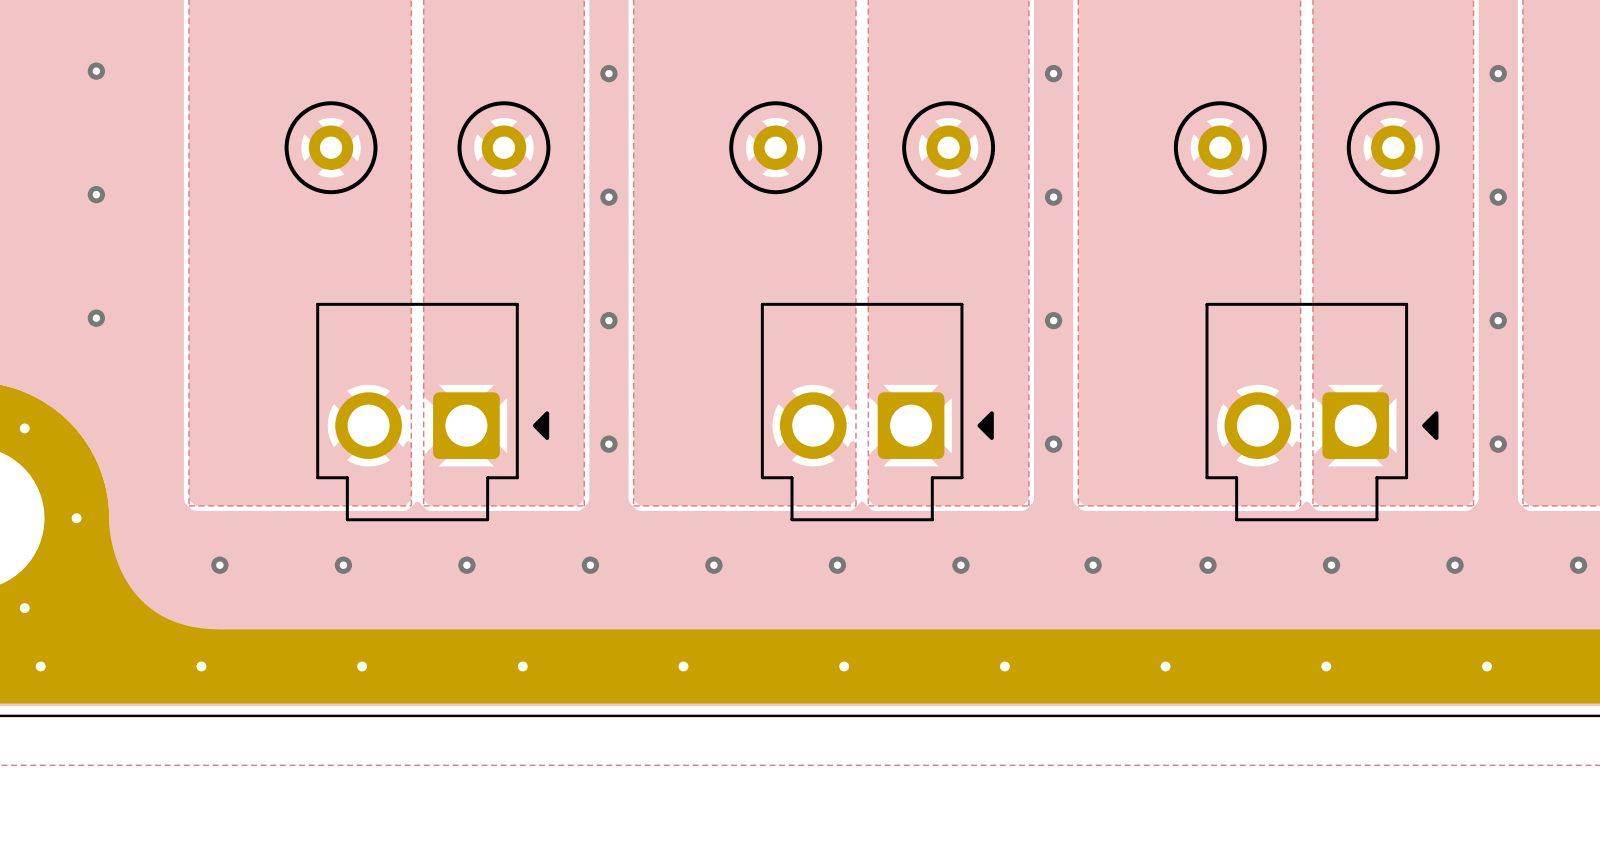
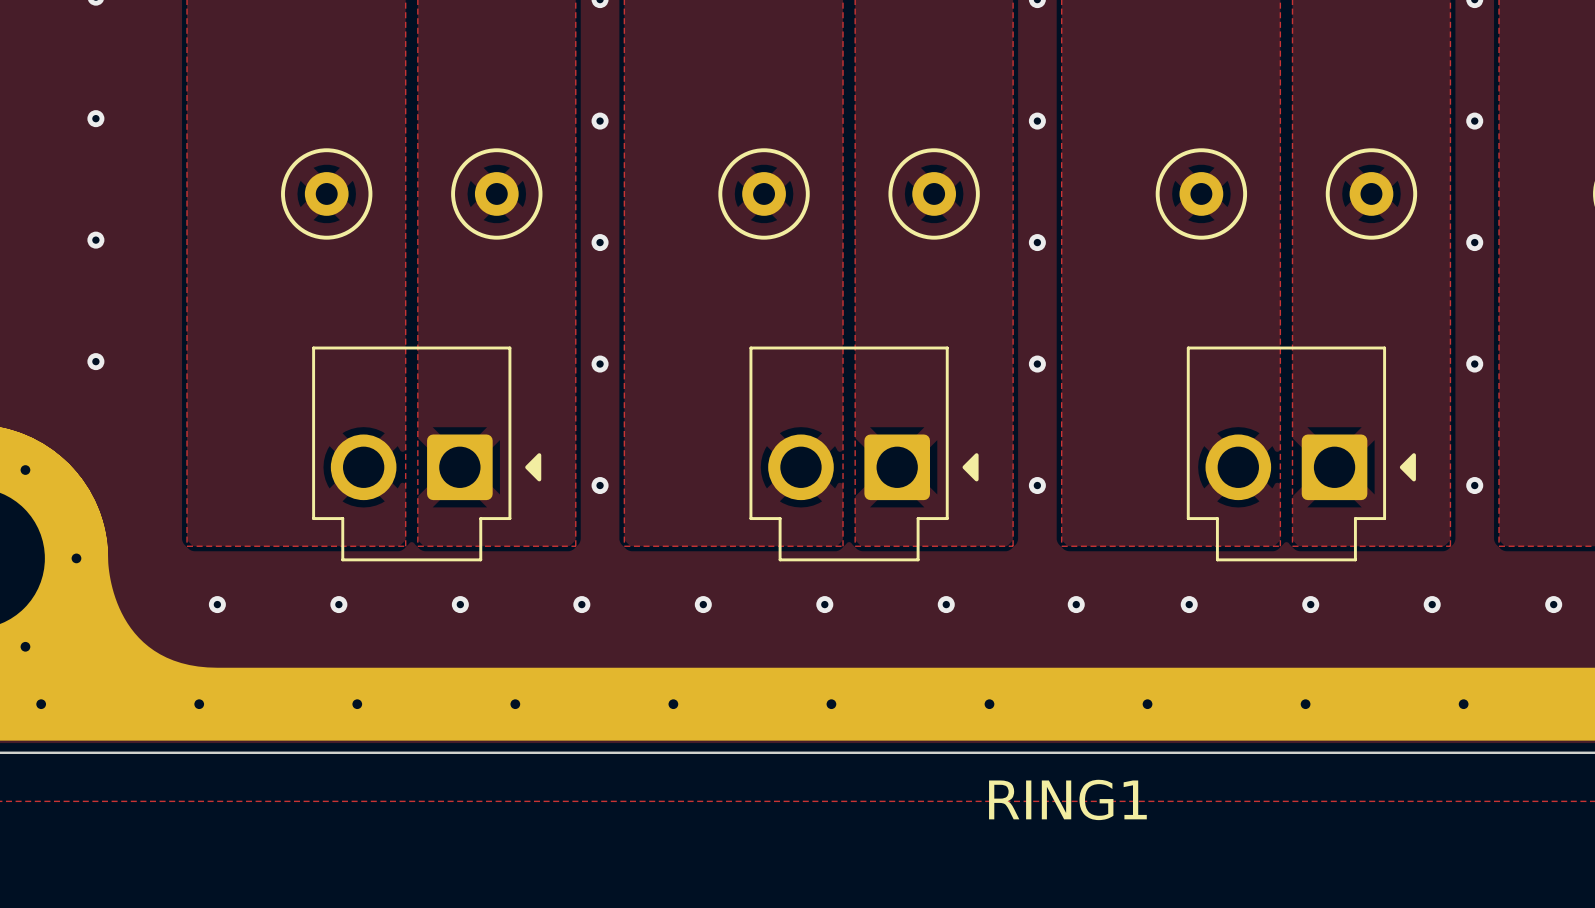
RING1 name: none -> RING1 (1067, 799)

